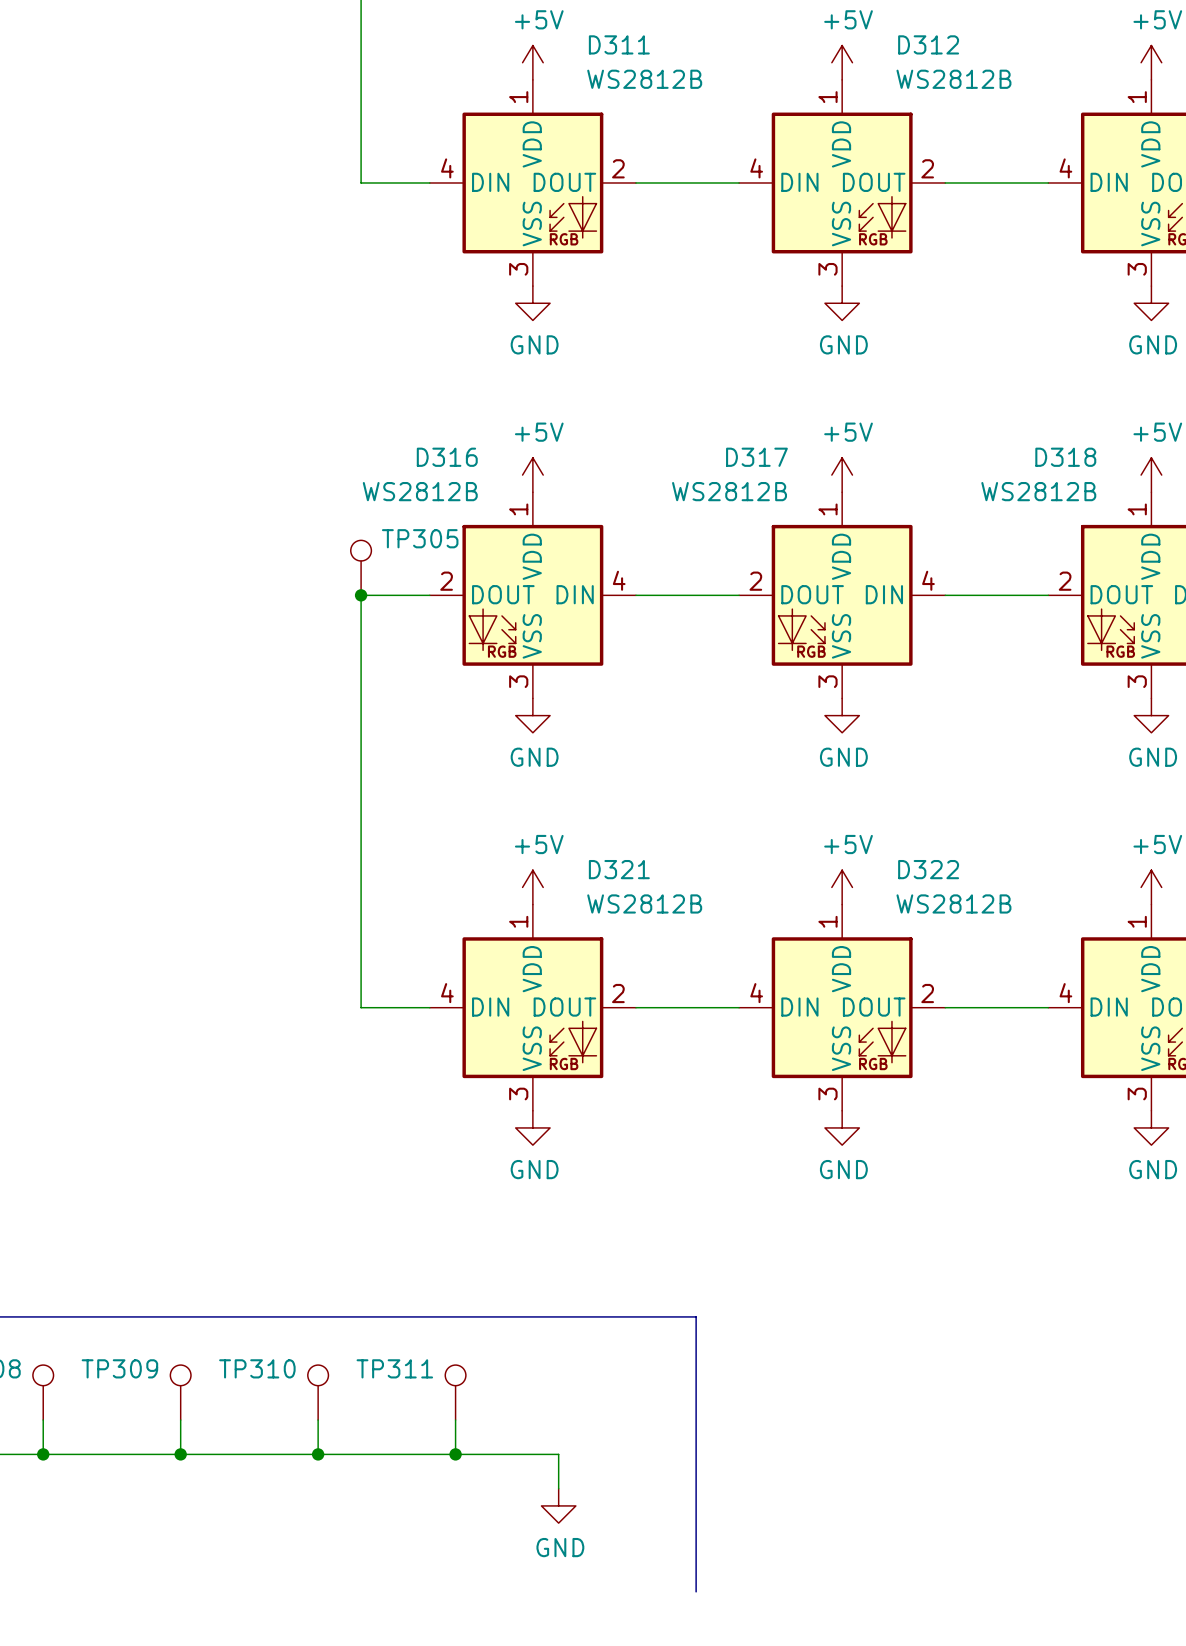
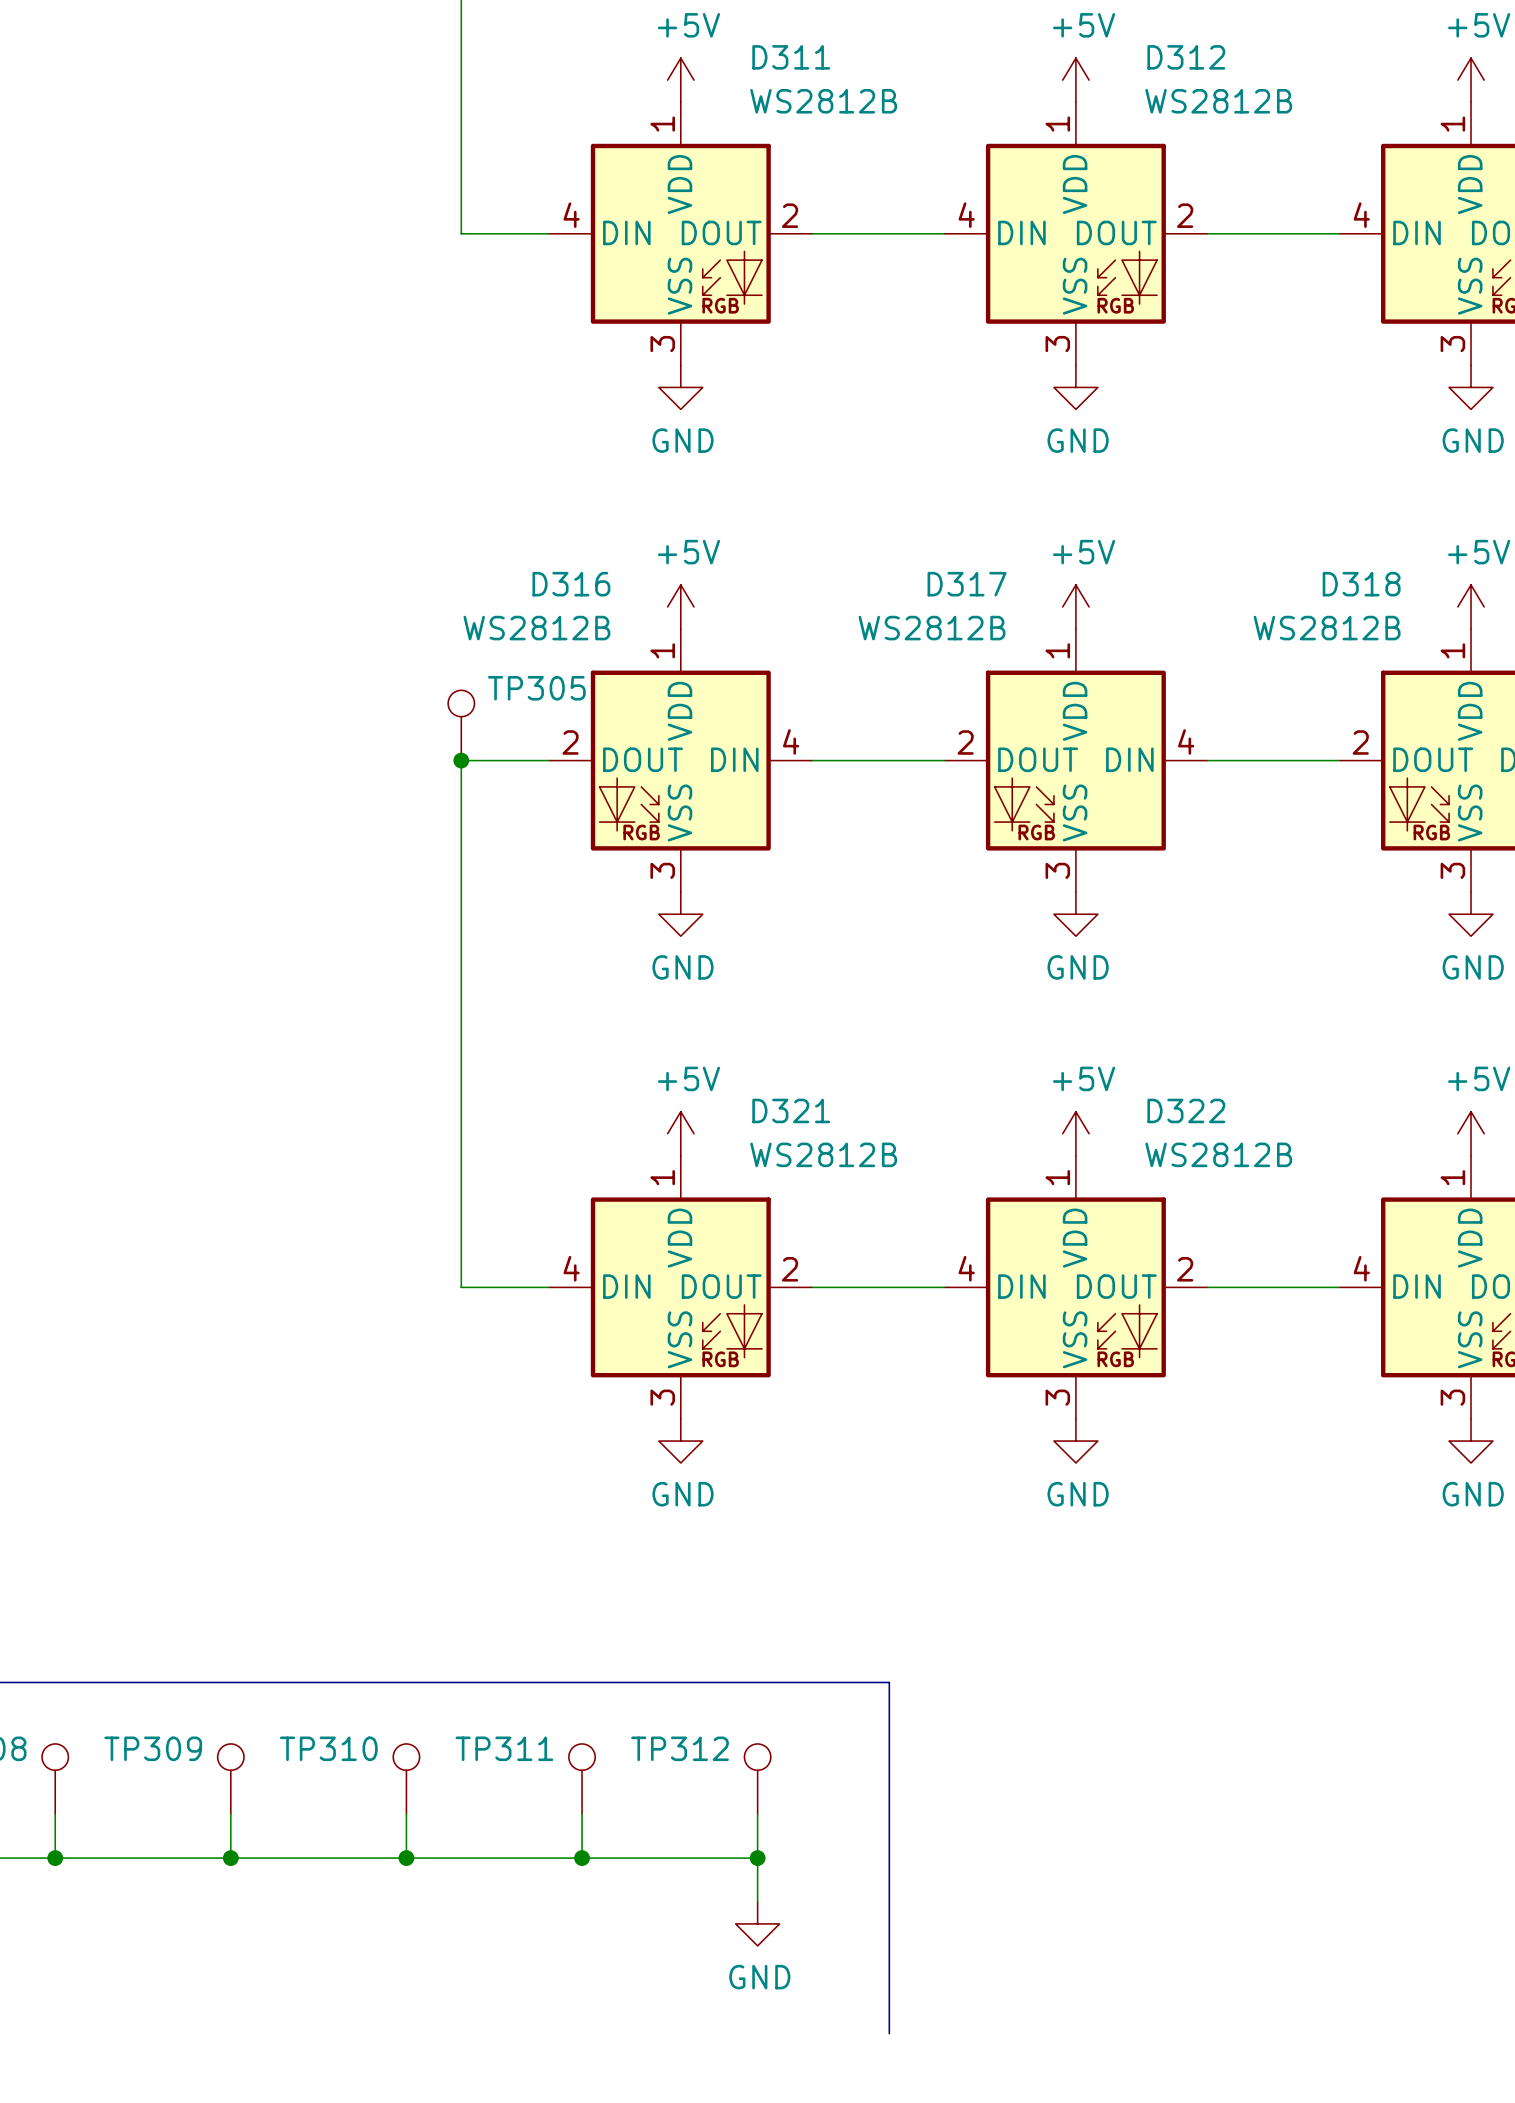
TP312: none -> (757, 1779)
wire: none -> (757, 1814) (757, 1901)
wire: (558, 1454) (558, 1488) -> (713, 1858) (757, 1858)
junction: none -> (757, 1858)
power symbol position: GND (558, 1505) -> GND (757, 1923)

